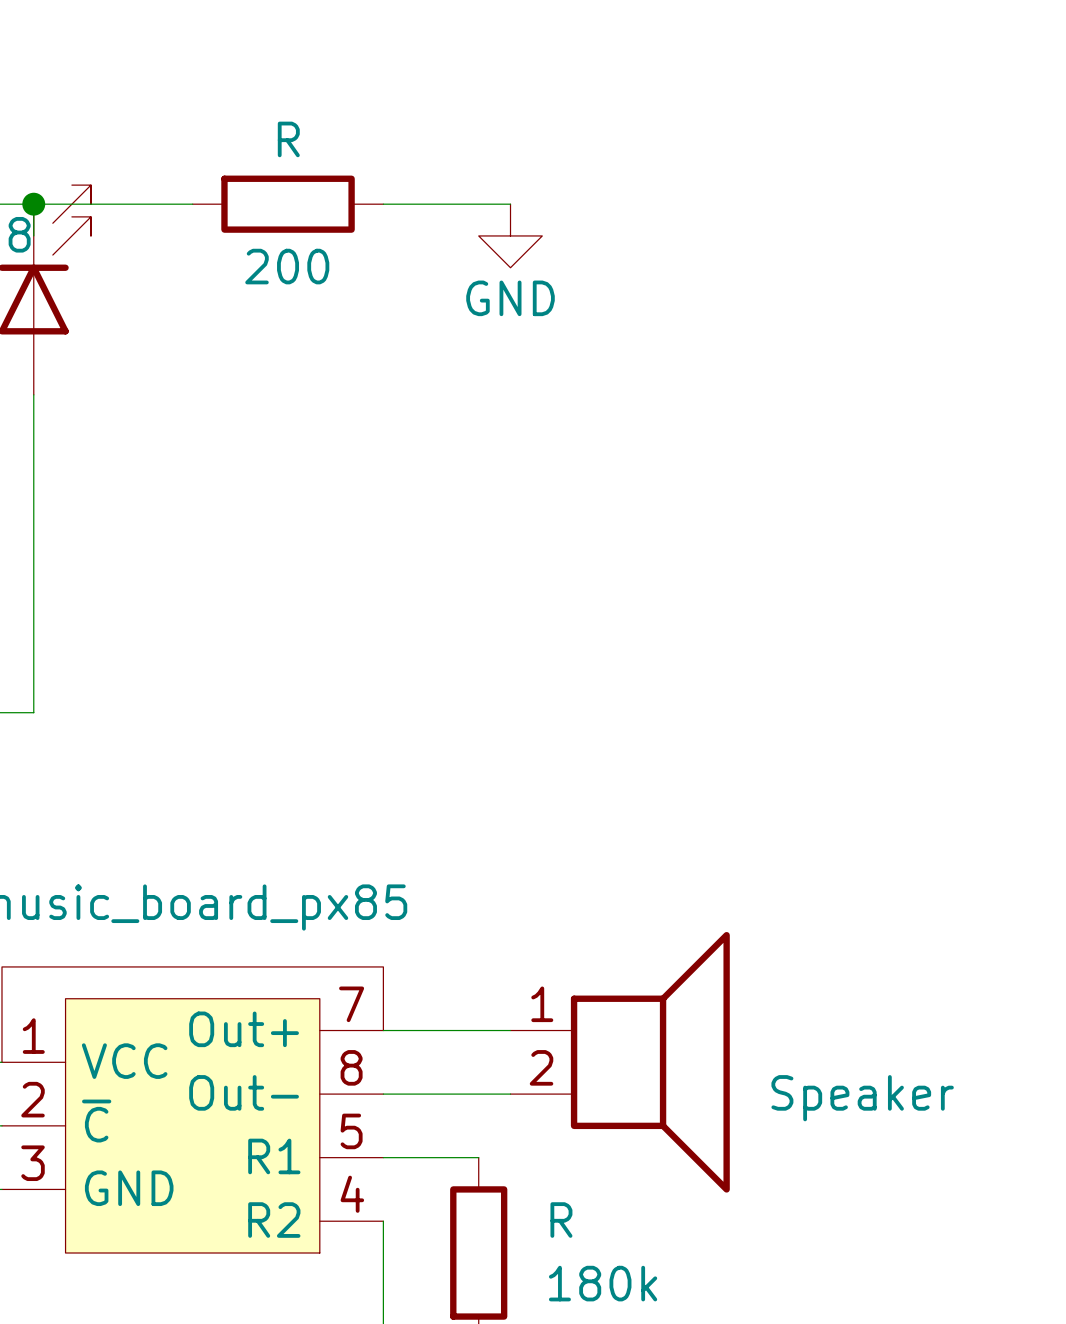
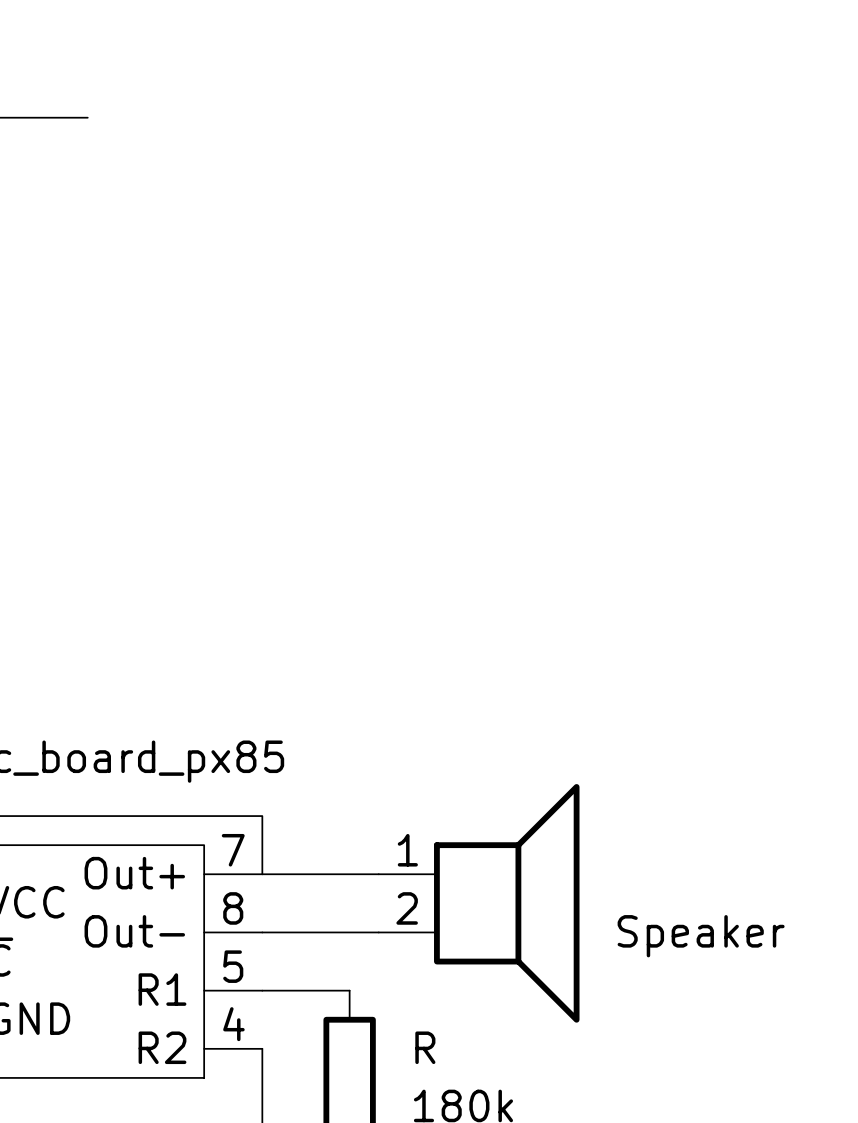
R: 200 (288, 204) -> none
wire: (383, 204) (510, 204) -> none
power symbol: GND (510, 235) -> none

